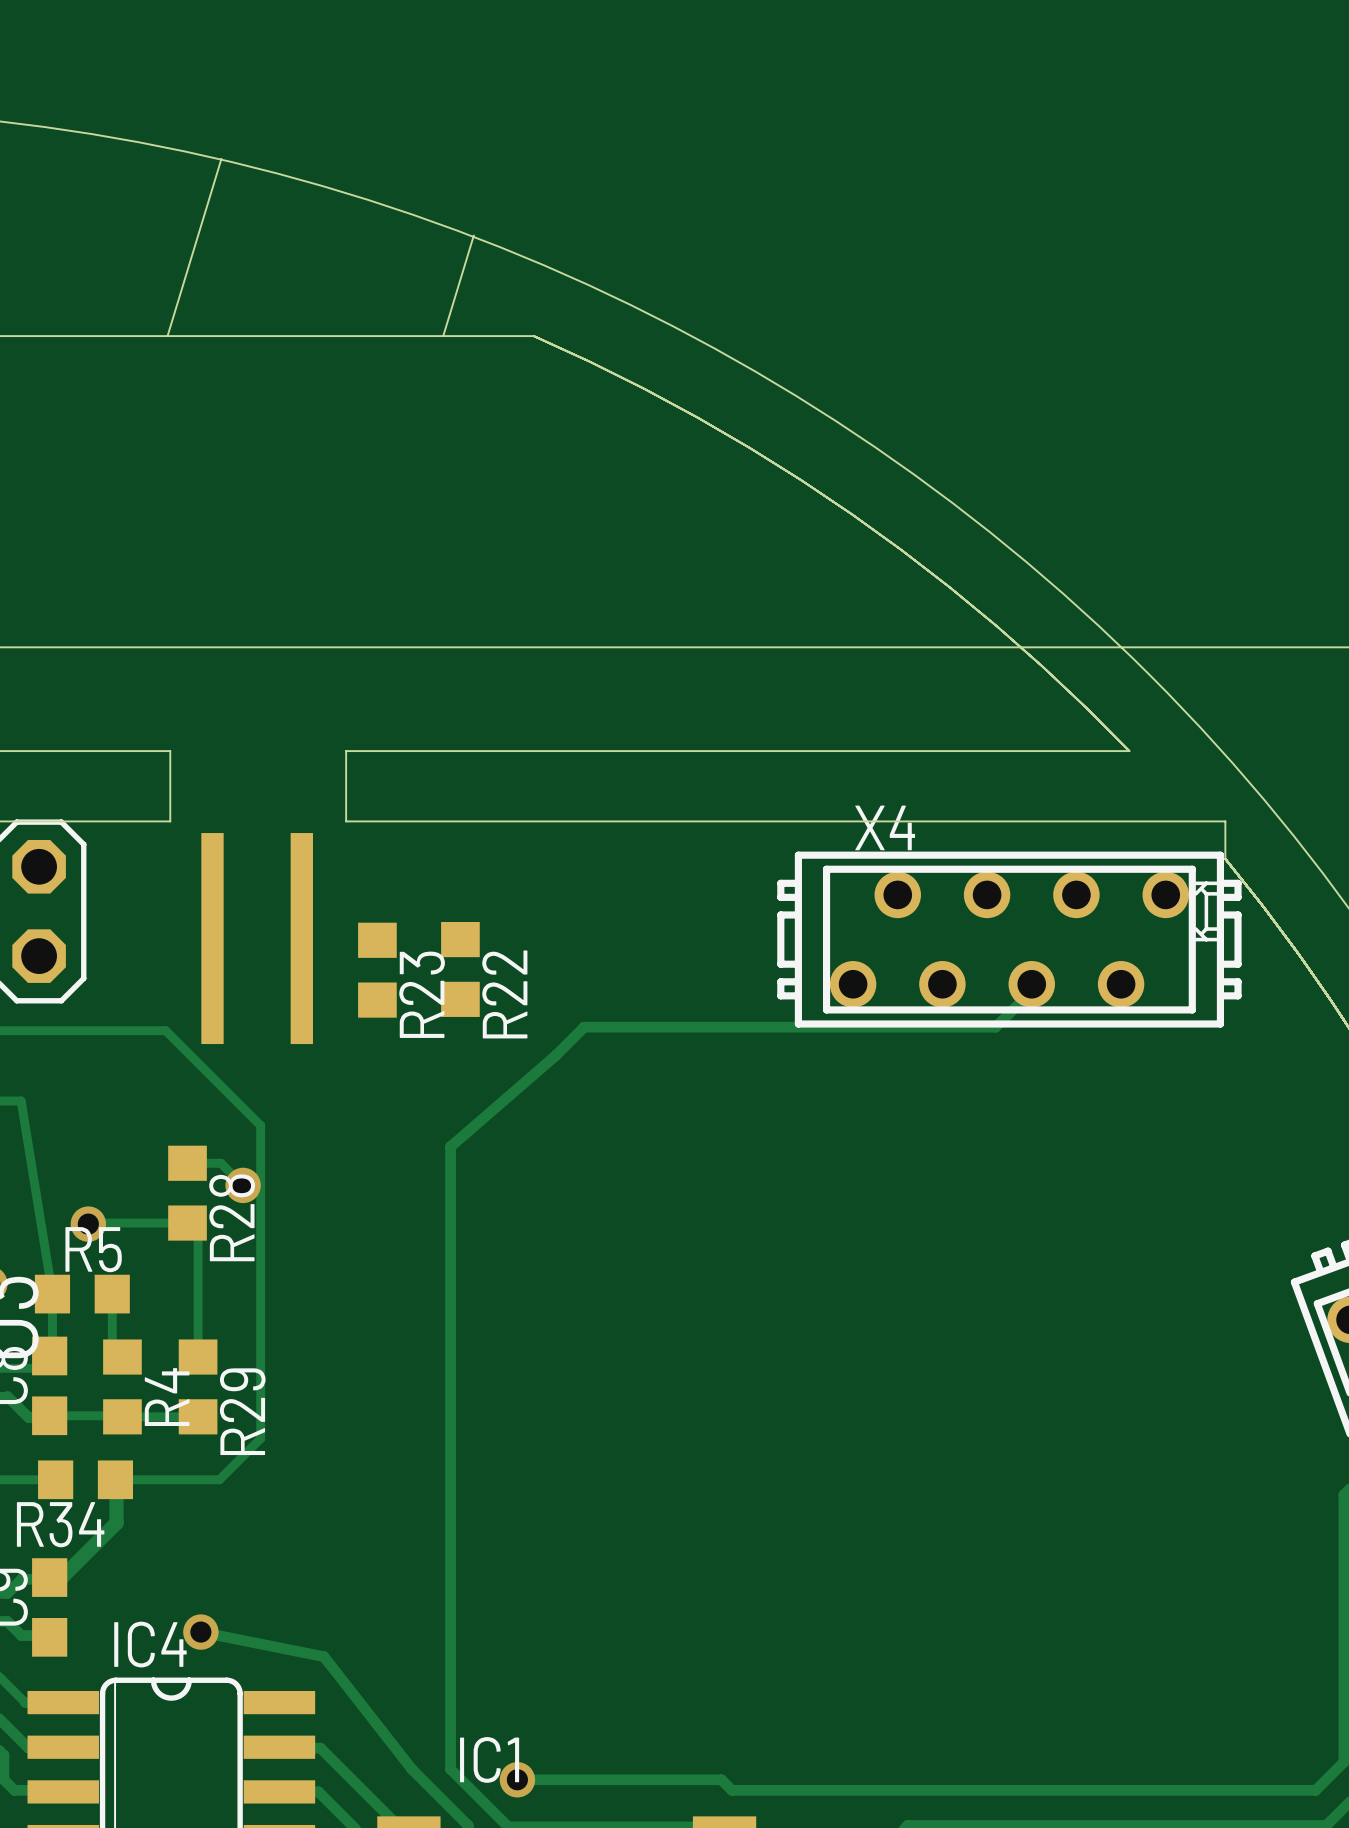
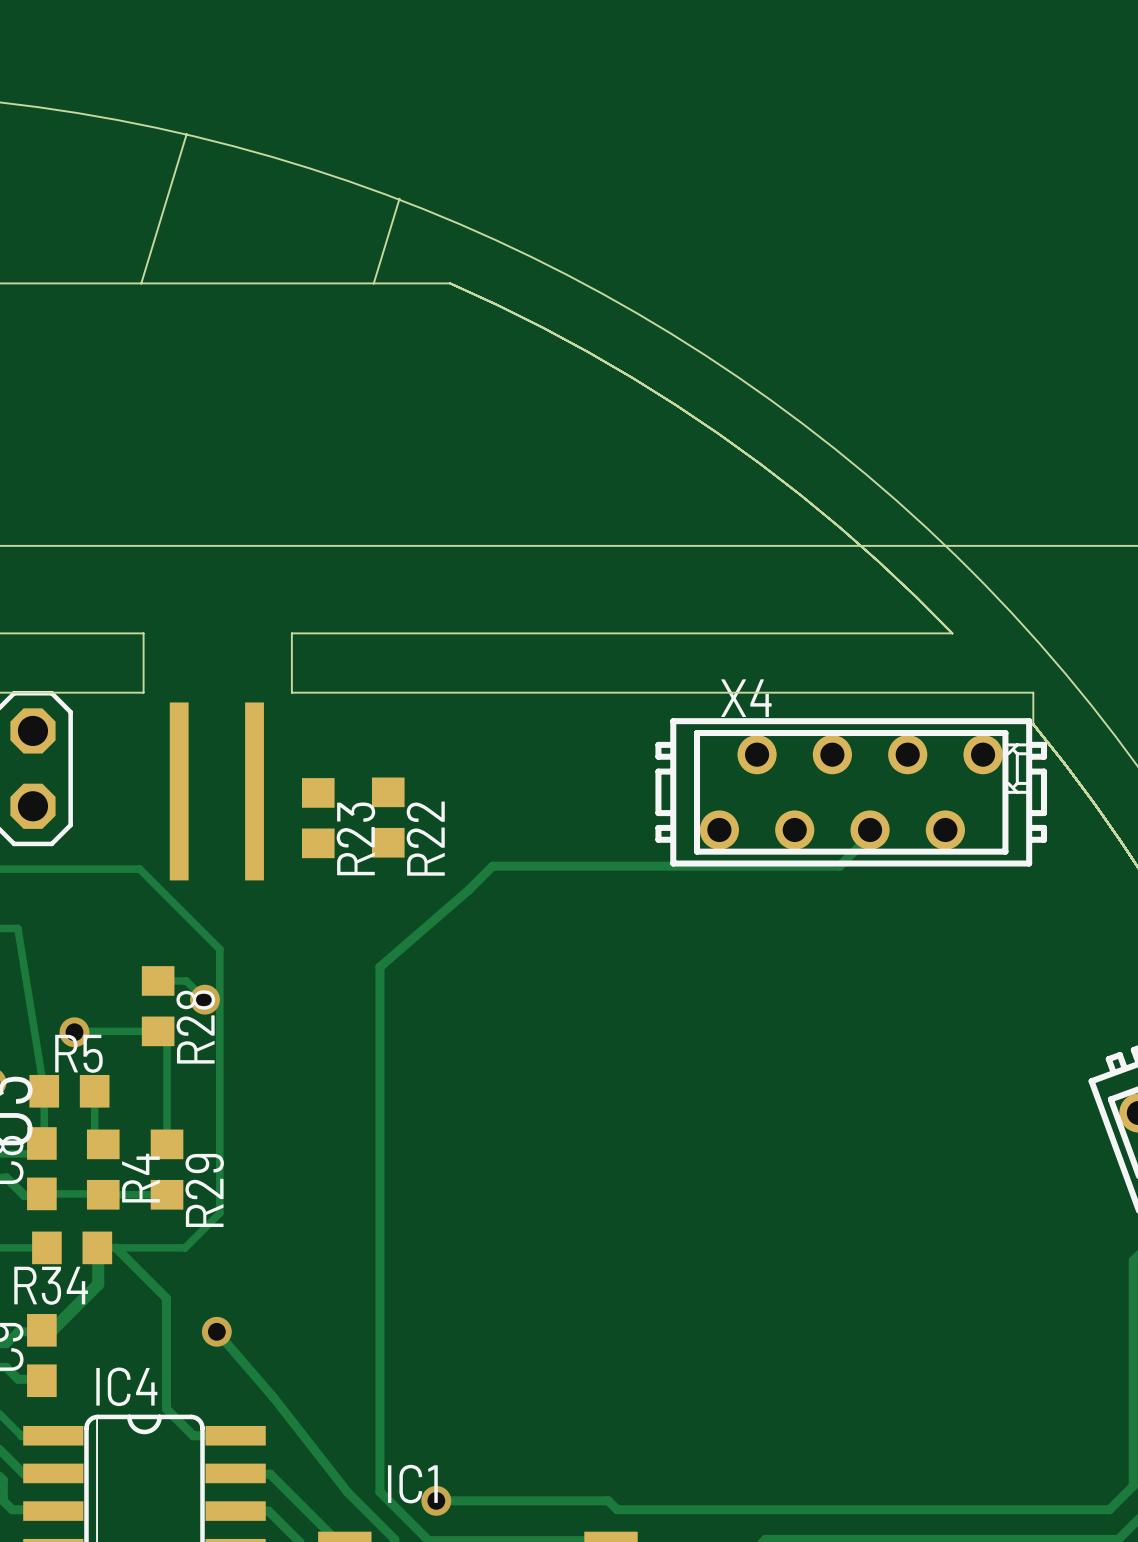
track: none -> (116, 1247) (166, 1298) (166, 1408) (193, 1435) (235, 1435)
track: (200, 1632) (323, 1656) -> (216, 1331) (273, 1397)
via position: (200, 1632) -> (216, 1331)

